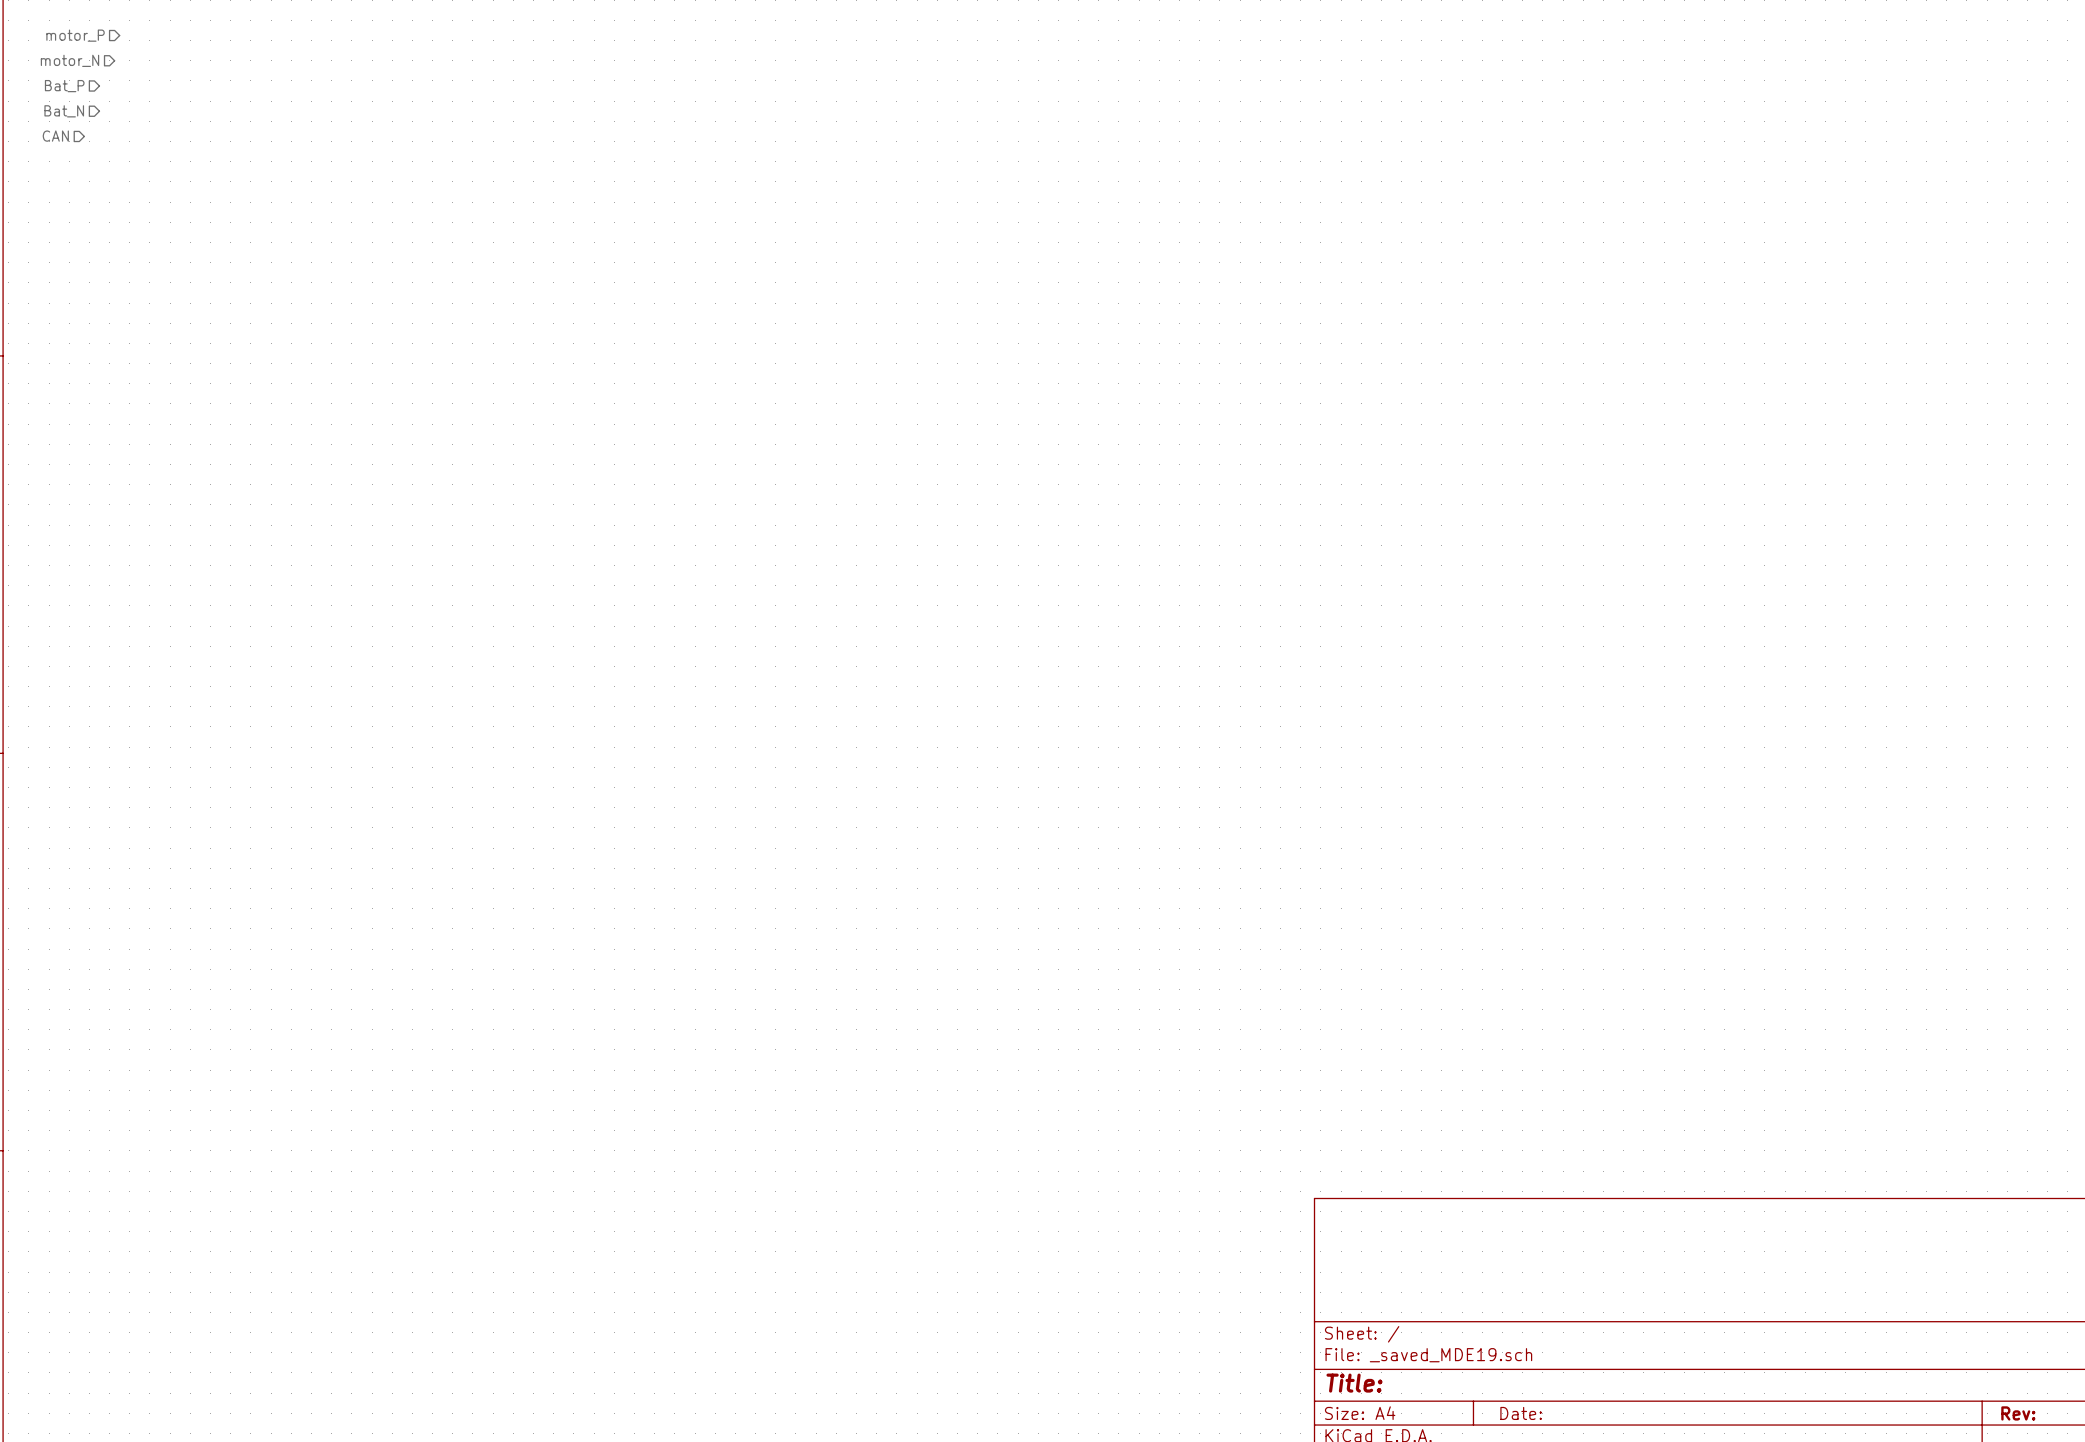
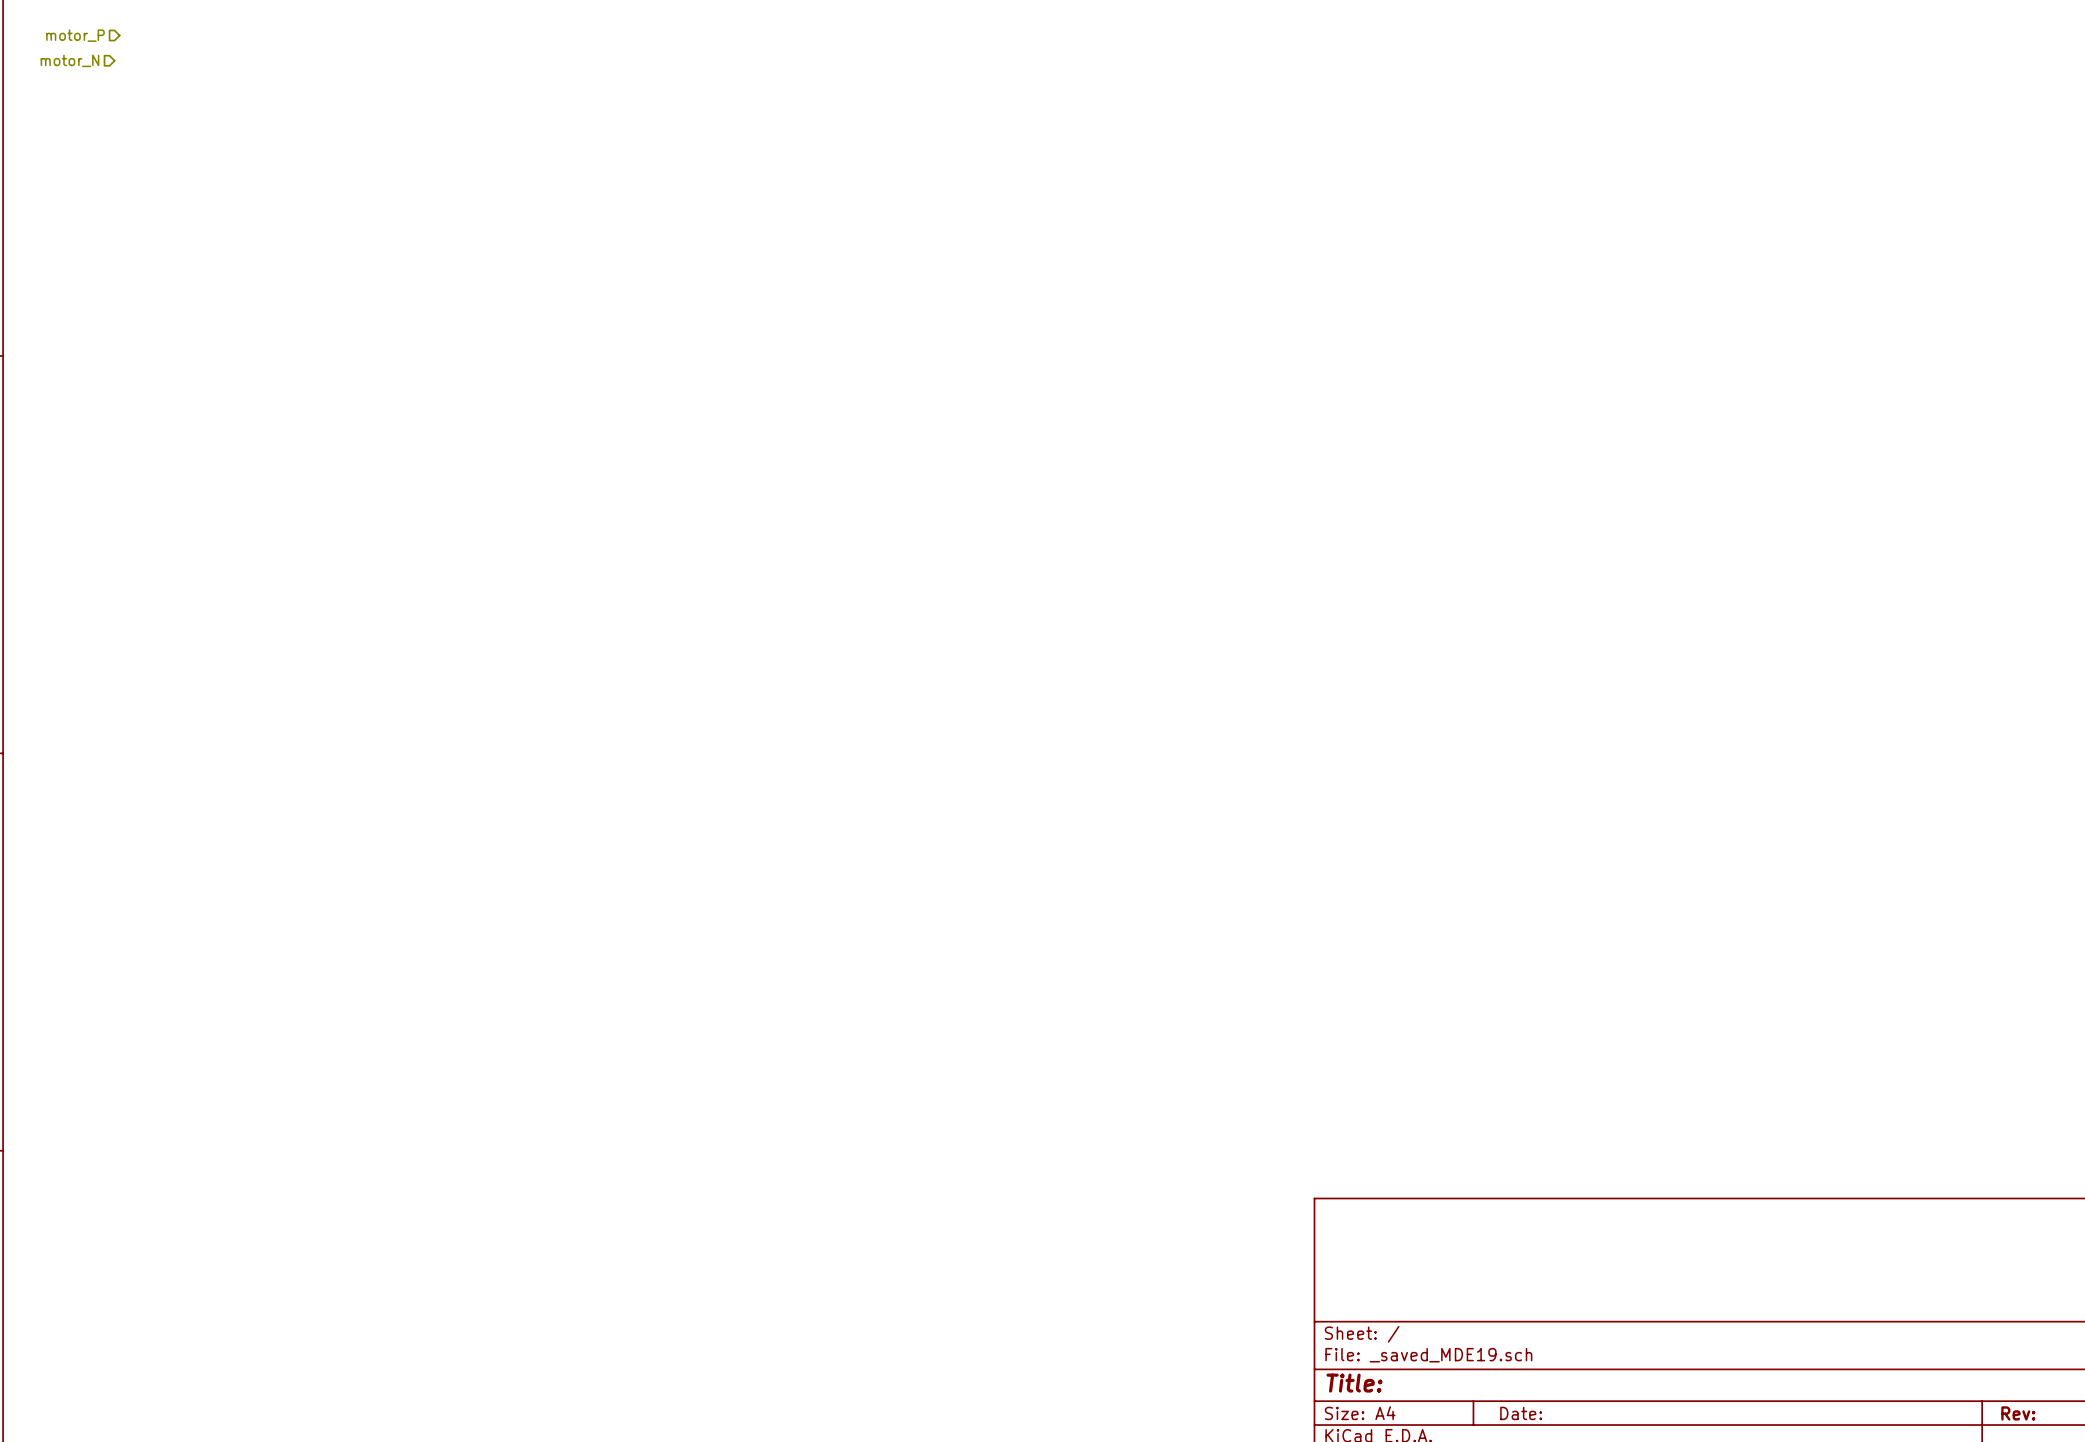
hierarchical label: Bat_P (64, 86) -> none
hierarchical label: Bat_N (64, 111) -> none
hierarchical label: CAN (55, 136) -> none

